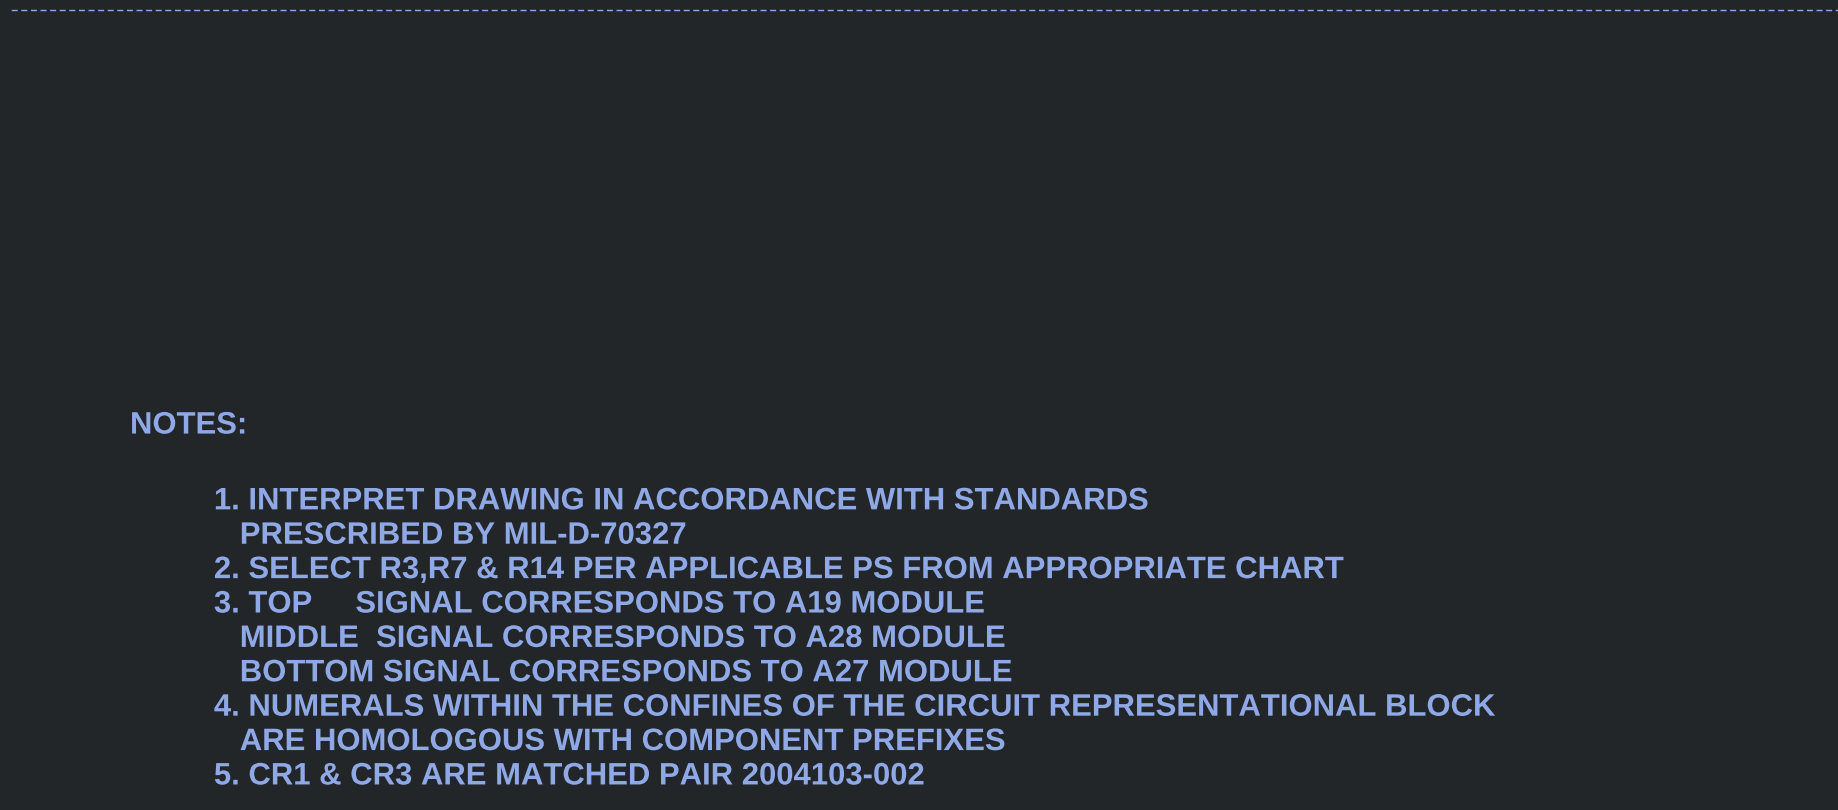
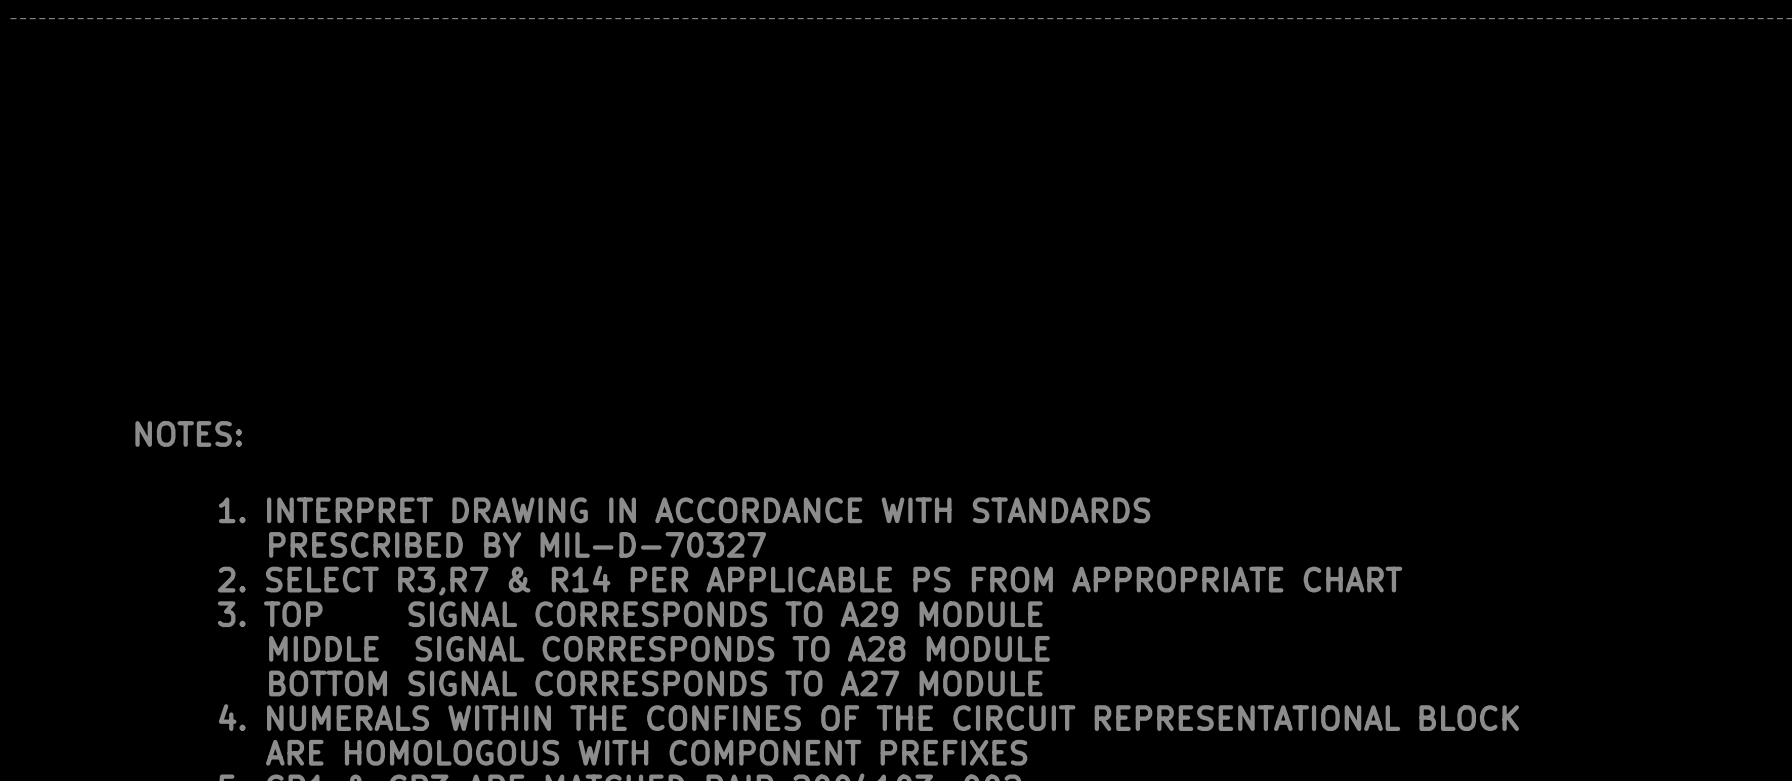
text: 3. TOP SIGNAL CORRESPONDS TO A19 MODULE (599, 601) -> 3. TOP SIGNAL CORRESPONDS TO A29 MODULE (630, 614)

